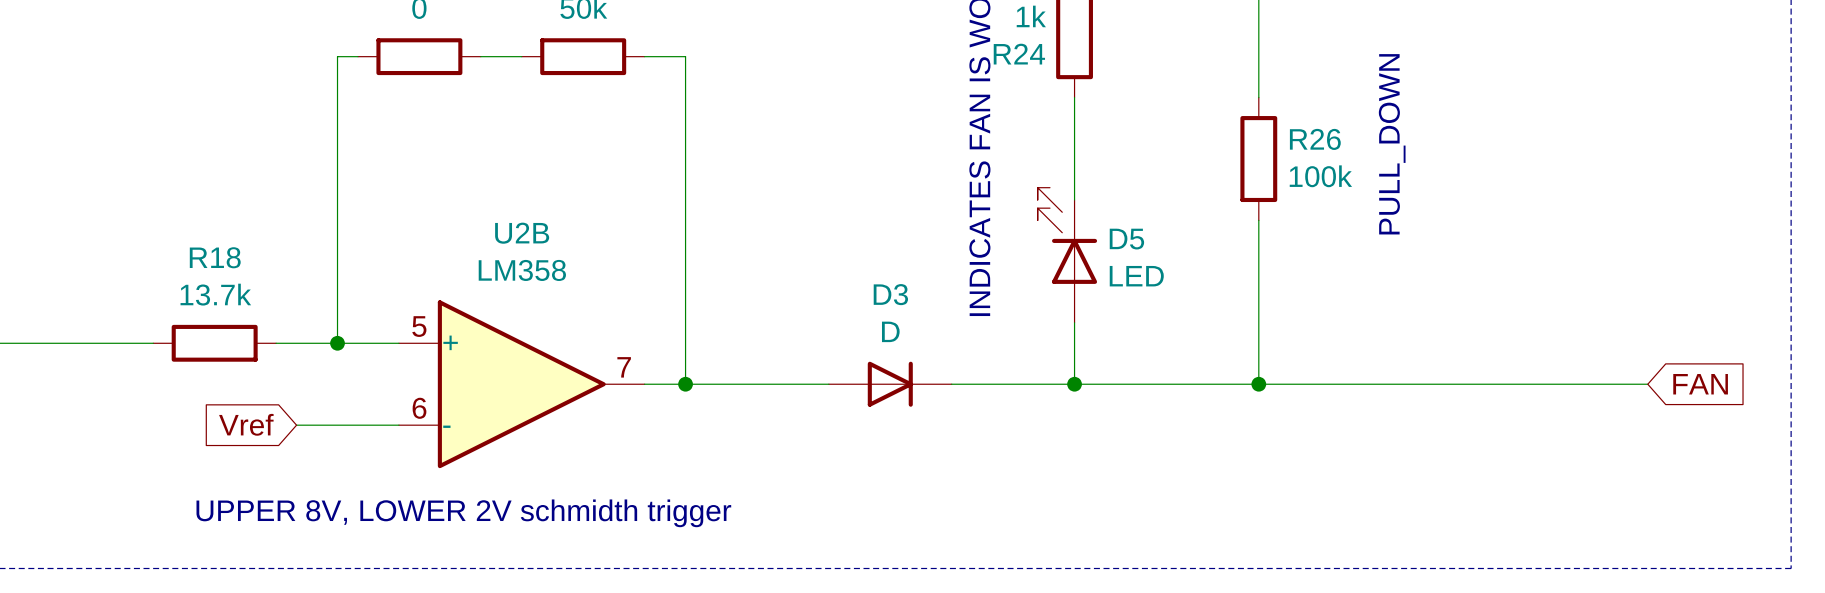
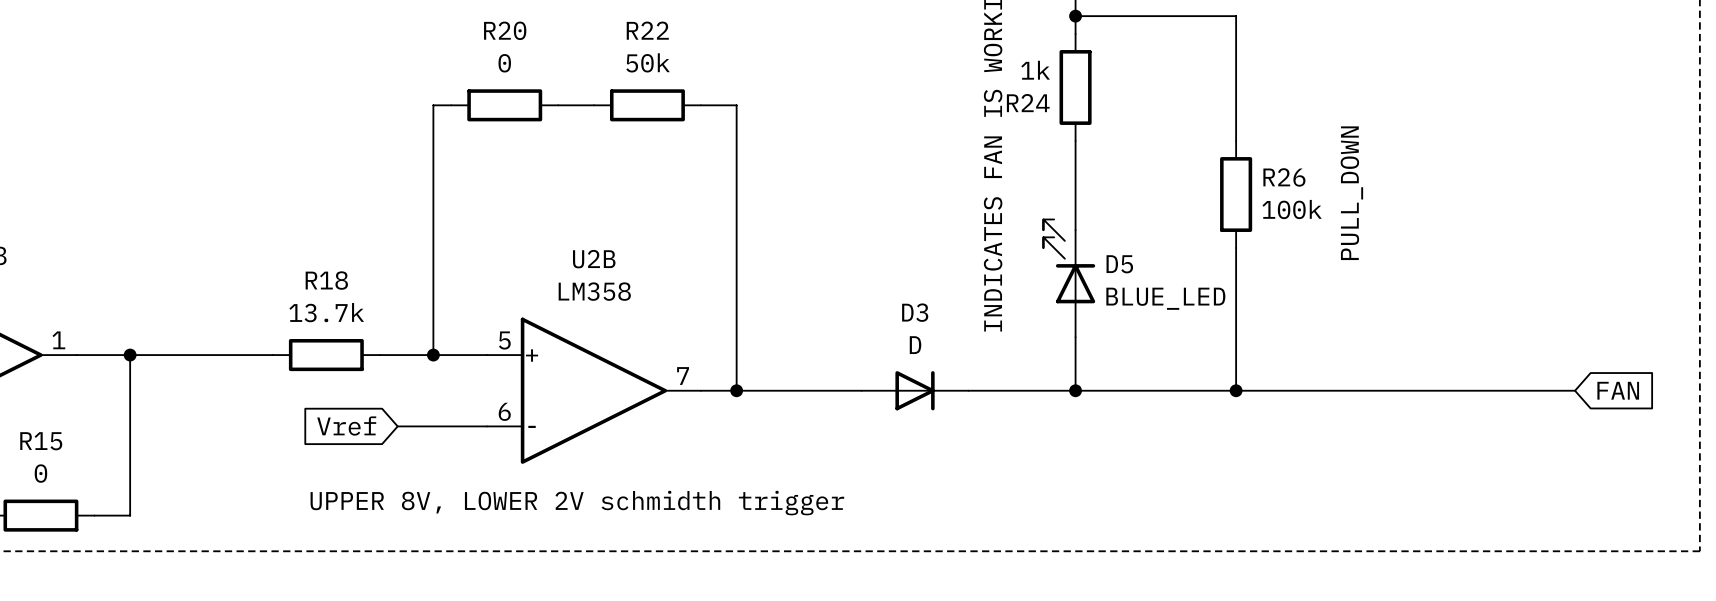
D5 value: LED (1136, 276) -> BLUE_LED (1165, 298)

